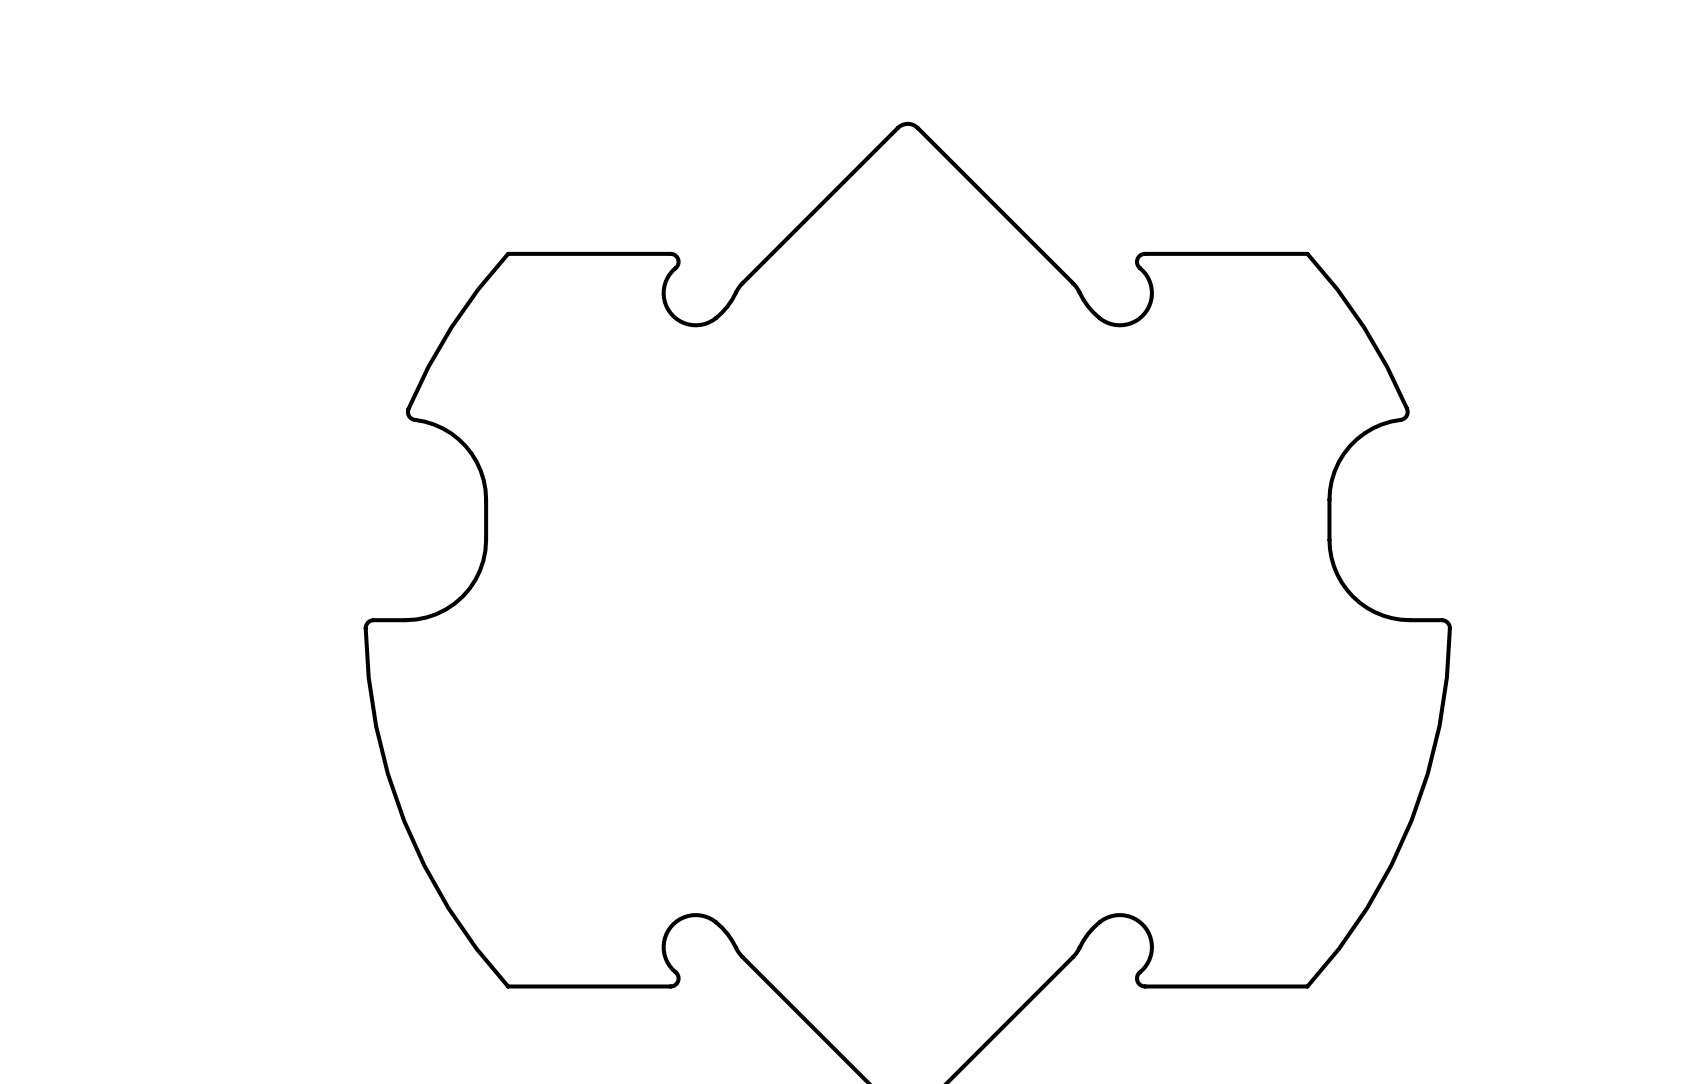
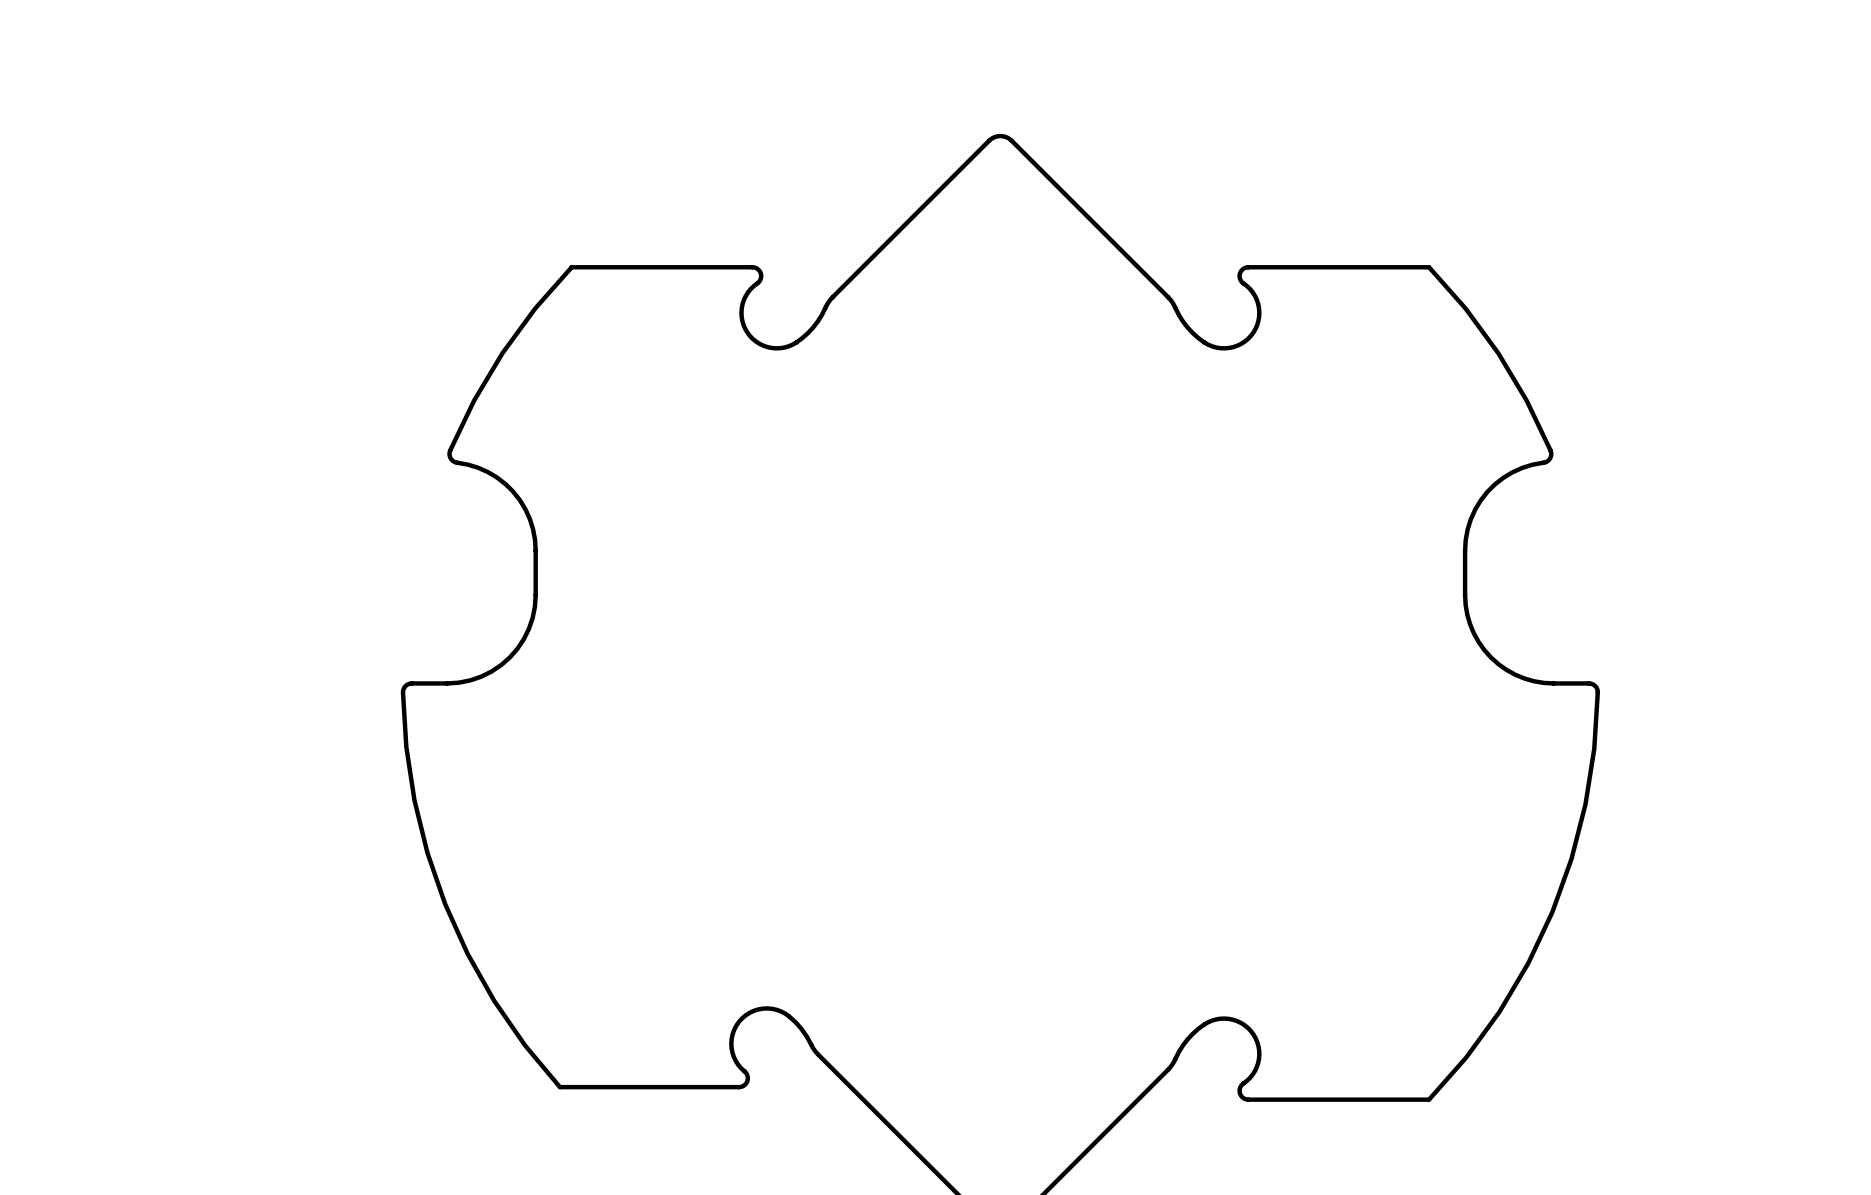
board edge: (917, 127) (907, 123) (897, 127) (742, 283) (722, 312) (704, 323) (696, 325) (684, 323) (673, 316) (666, 306) (664, 298) (664, 285) (667, 277) (678, 263) (677, 258) (673, 254) (508, 253) (478, 289) (451, 327) (428, 367) (408, 408) -> (1011, 140) (1000, 136) (989, 140) (832, 297) (808, 332) (796, 342) (784, 347) (772, 348) (759, 344) (749, 335) (743, 324) (741, 312) (743, 299) (760, 278) (759, 271) (755, 267) (571, 267) (535, 308) (502, 353) (474, 400) (450, 450)
board edge: (1059, 269) (1075, 285) (1088, 306) (1099, 318) (1110, 323) (1123, 325) (1131, 323) (1141, 316) (1150, 302) (1151, 289) (1149, 281) (1137, 263) (1137, 258) (1142, 254) (1307, 253) (1337, 289) (1363, 327) (1387, 367) (1407, 408) -> (1168, 297) (1182, 321) (1198, 337) (1211, 346) (1228, 348) (1237, 345) (1247, 339) (1255, 328) (1258, 320) (1258, 308) (1256, 299) (1239, 278) (1240, 272) (1244, 267) (1429, 267) (1465, 308) (1498, 353) (1526, 400) (1550, 450)
board edge: (1449, 628) (1446, 677) (1439, 726) (1427, 773) (1411, 820) (1391, 865) (1367, 908) (1339, 948) (1307, 986) (1142, 985) (1137, 982) (1137, 977) (1150, 956) (1150, 937) (1139, 921) (1121, 915) (1106, 918) (1093, 927) (1075, 954) (1060, 970) -> (1597, 692) (1594, 748) (1585, 804) (1571, 859) (1552, 912) (1528, 963) (1499, 1011) (1466, 1057) (1429, 1099) (1245, 1099) (1240, 1094) (1239, 1088) (1256, 1067) (1258, 1058) (1258, 1046) (1253, 1034) (1247, 1027) (1240, 1022) (1228, 1018) (1211, 1020) (1198, 1028) (1182, 1045) (1168, 1069)

